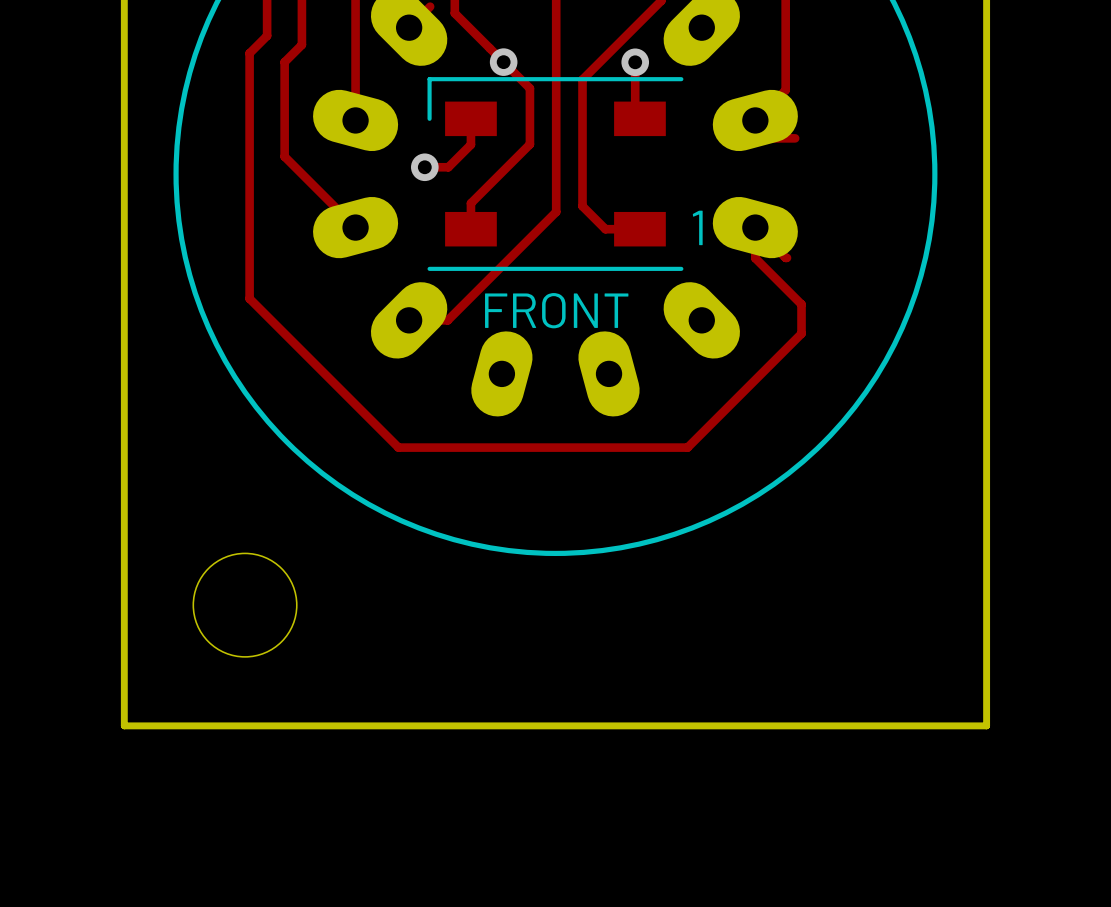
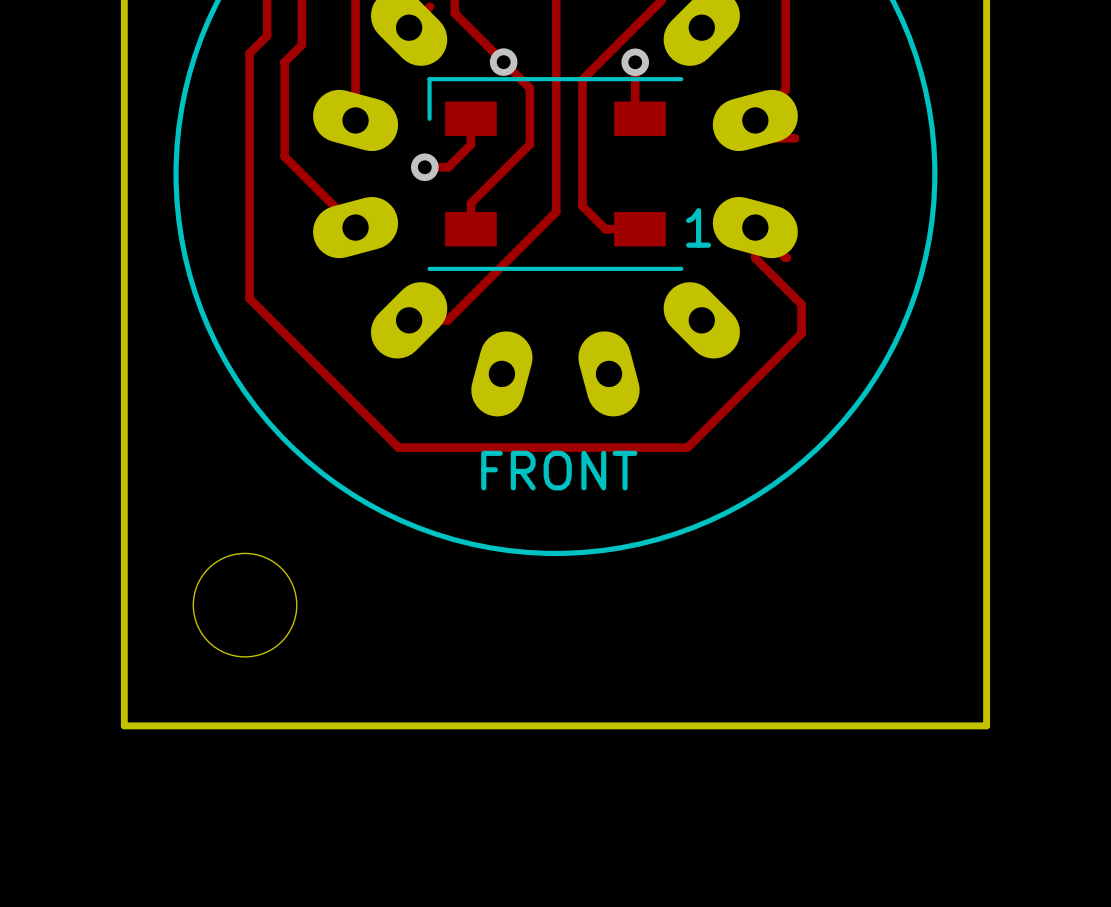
part text position: FRONT (556, 310) -> FRONT (559, 470)

